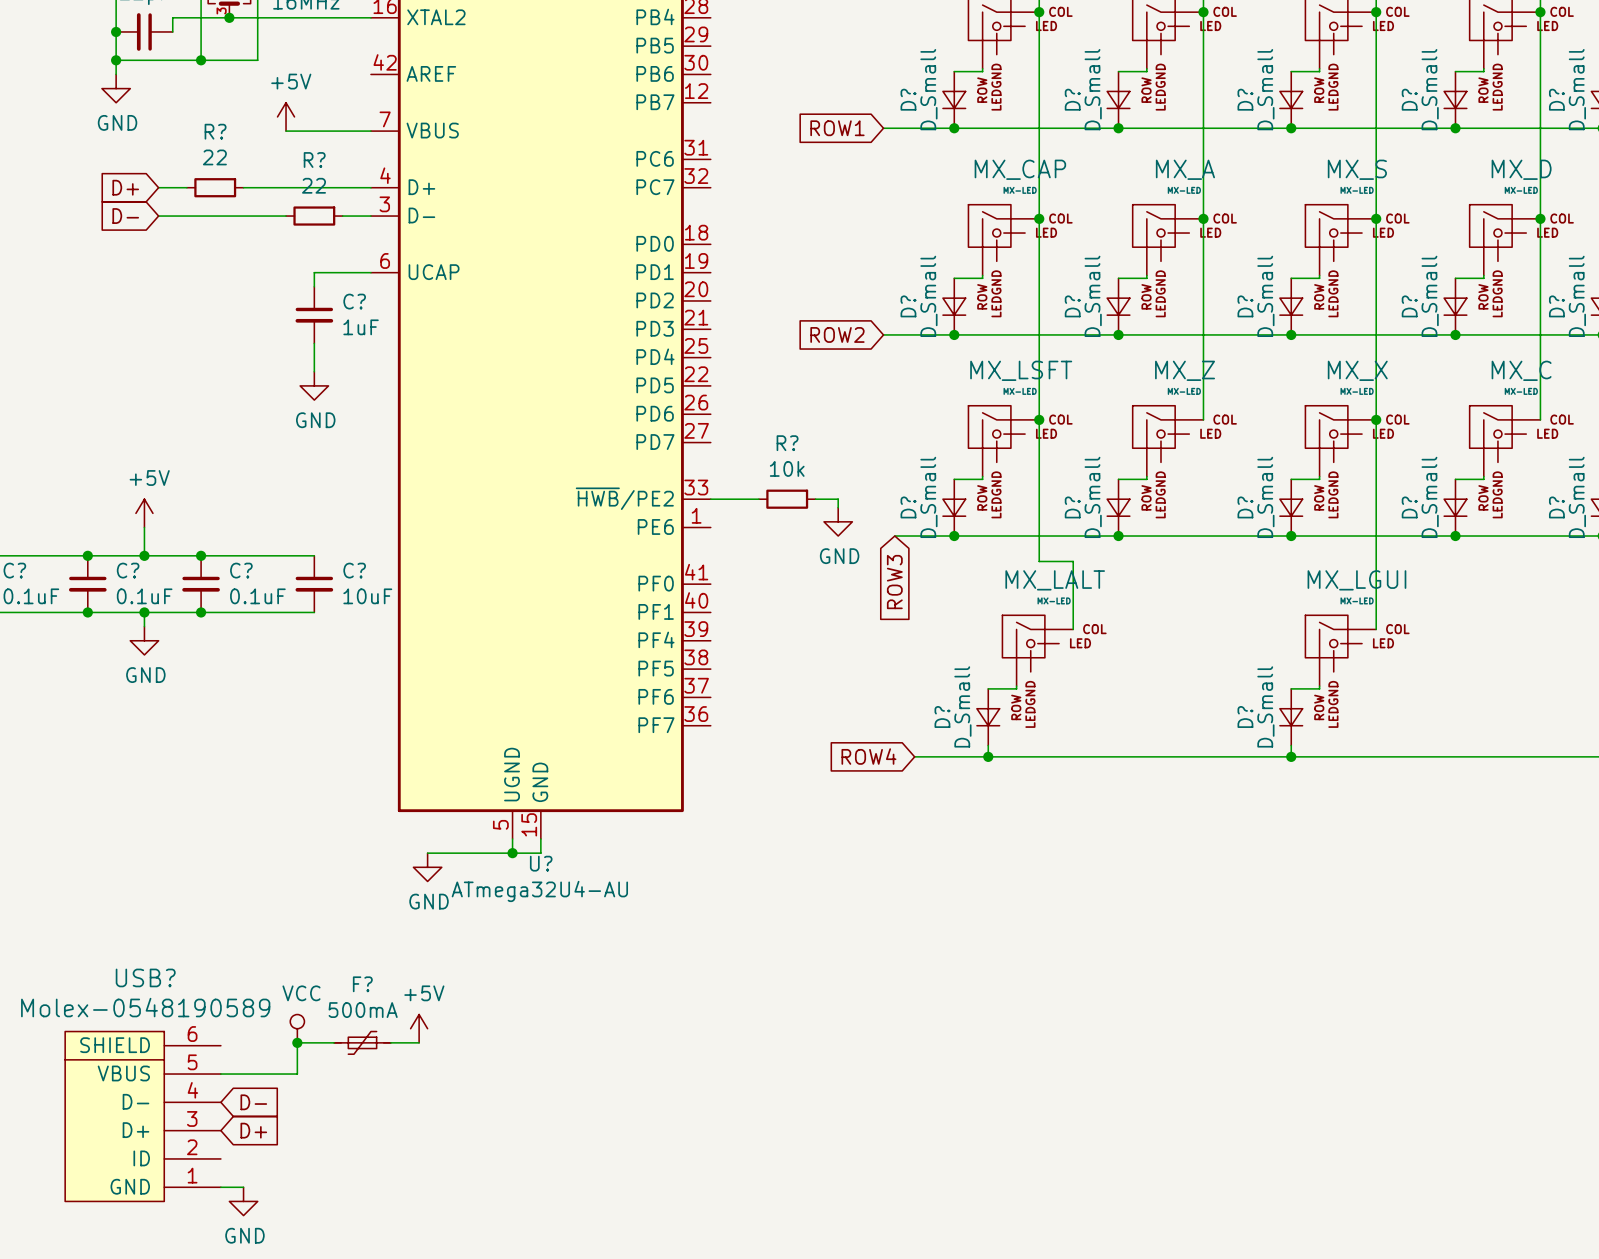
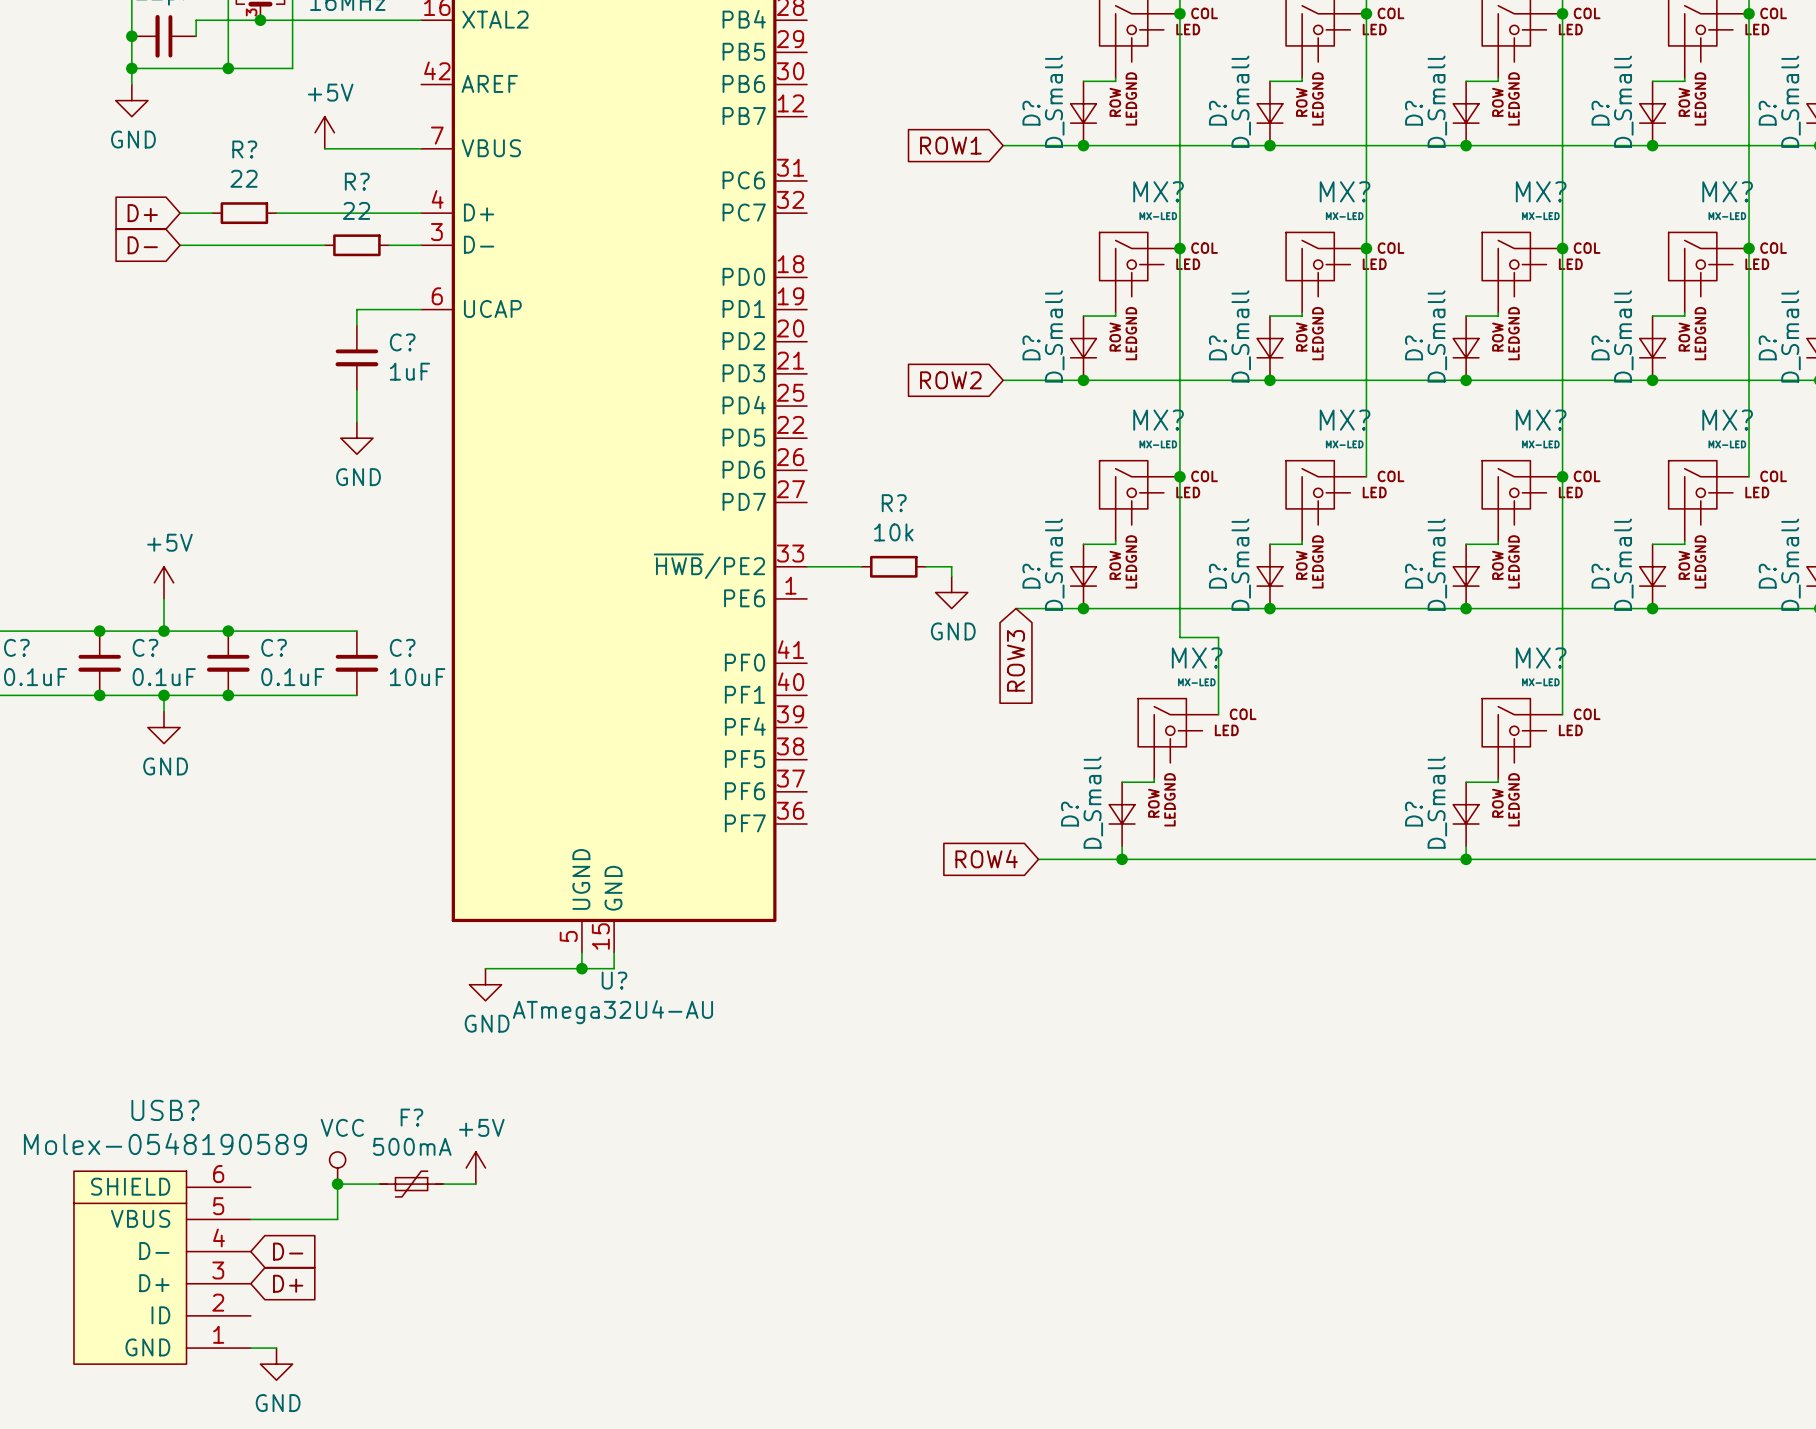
MX_CAP name: MX_CAP (1020, 169) -> MX? (1158, 191)
MX_A name: MX_A (1185, 169) -> MX? (1345, 191)
MX_S name: MX_S (1357, 169) -> MX? (1541, 191)
MX_D name: MX_D (1521, 169) -> MX? (1727, 191)
MX_LSFT name: MX_LSFT (1021, 370) -> MX? (1158, 420)
MX_Z name: MX_Z (1185, 370) -> MX? (1345, 420)
MX_X name: MX_X (1357, 370) -> MX? (1541, 420)
MX_C name: MX_C (1521, 370) -> MX? (1727, 420)
MX_LALT name: MX_LALT (1055, 580) -> MX? (1197, 658)
MX_LGUI name: MX_LGUI (1356, 580) -> MX? (1541, 658)

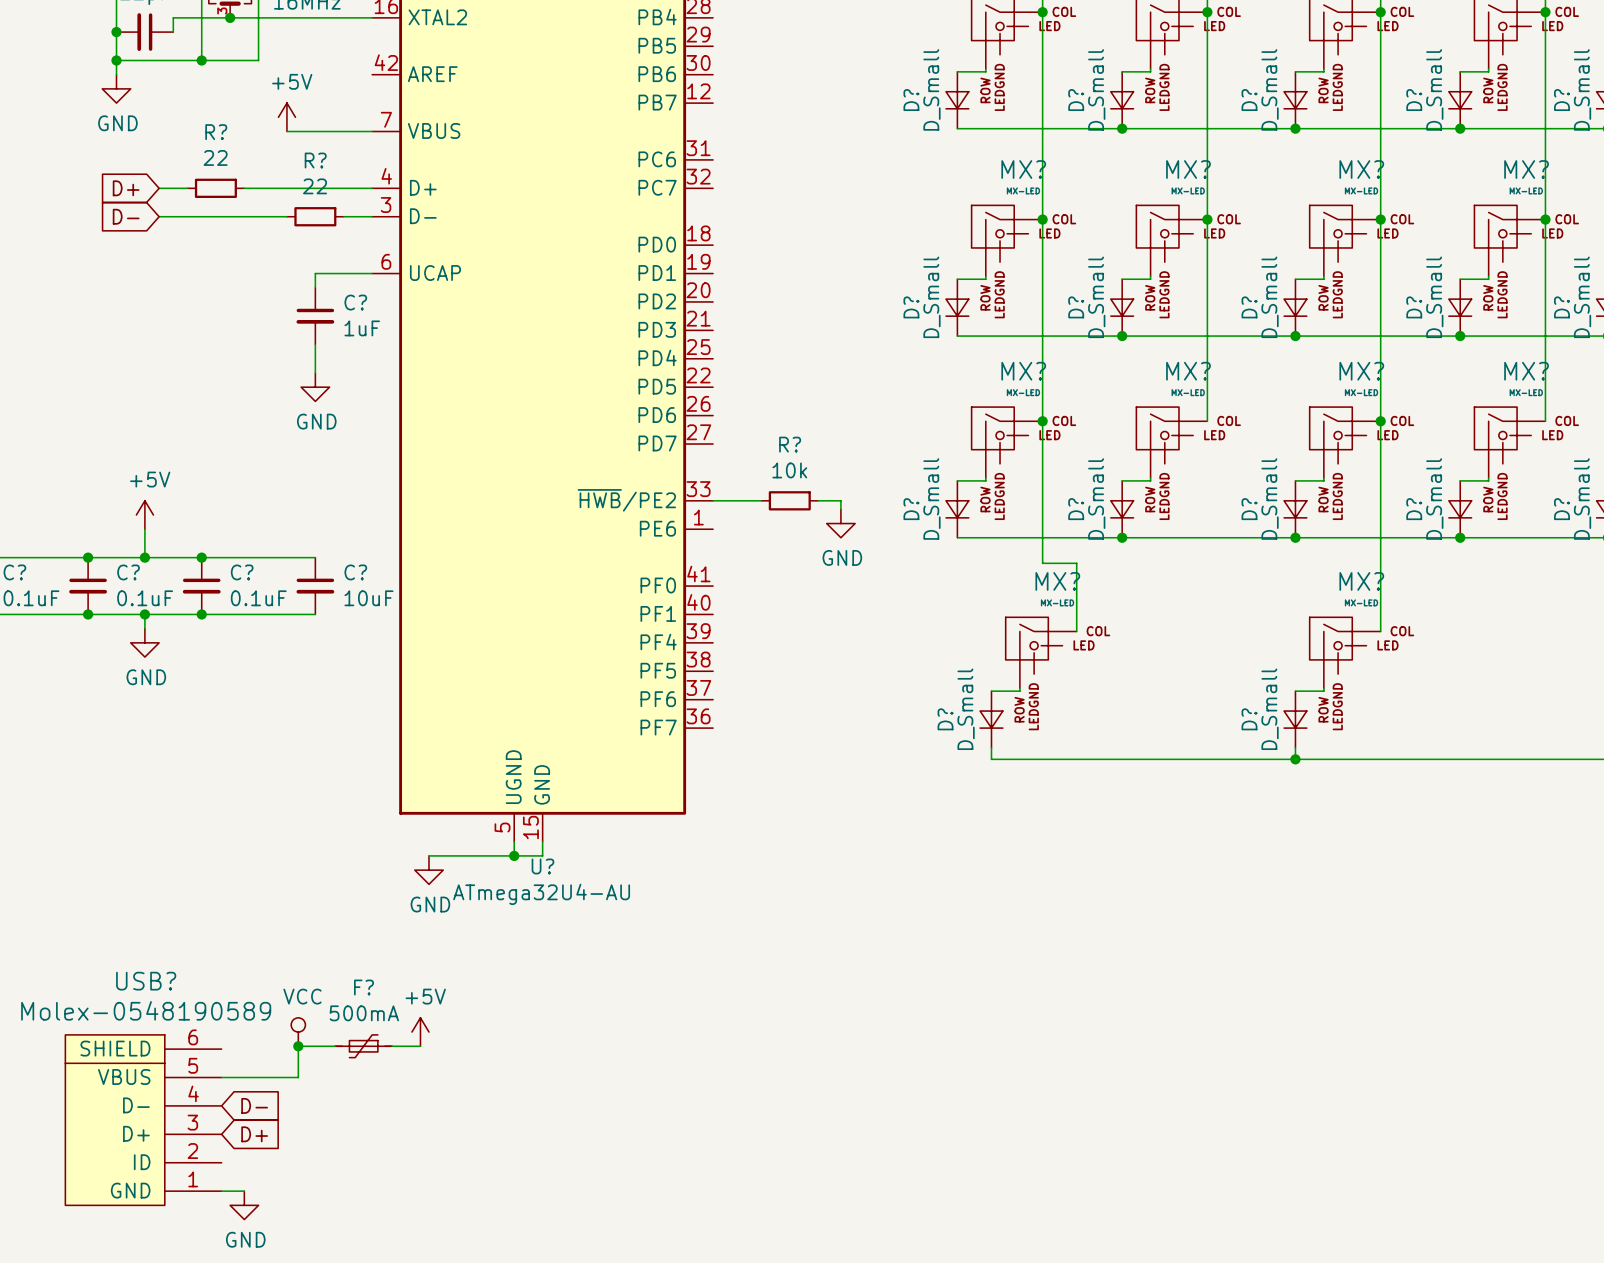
global label: ROW1 (950, 145) -> none
wire: (1003, 145) (1083, 145) -> none
junction: (1083, 145) -> none
global label: ROW2 (950, 380) -> none
wire: (1003, 380) (1083, 380) -> none
junction: (1083, 380) -> none
wire: (1015, 608) (1083, 608) -> none
junction: (1083, 608) -> none
global label: ROW3 (1015, 660) -> none
global label: ROW4 (986, 858) -> none
wire: (1038, 859) (1122, 859) -> none
junction: (1122, 859) -> none

